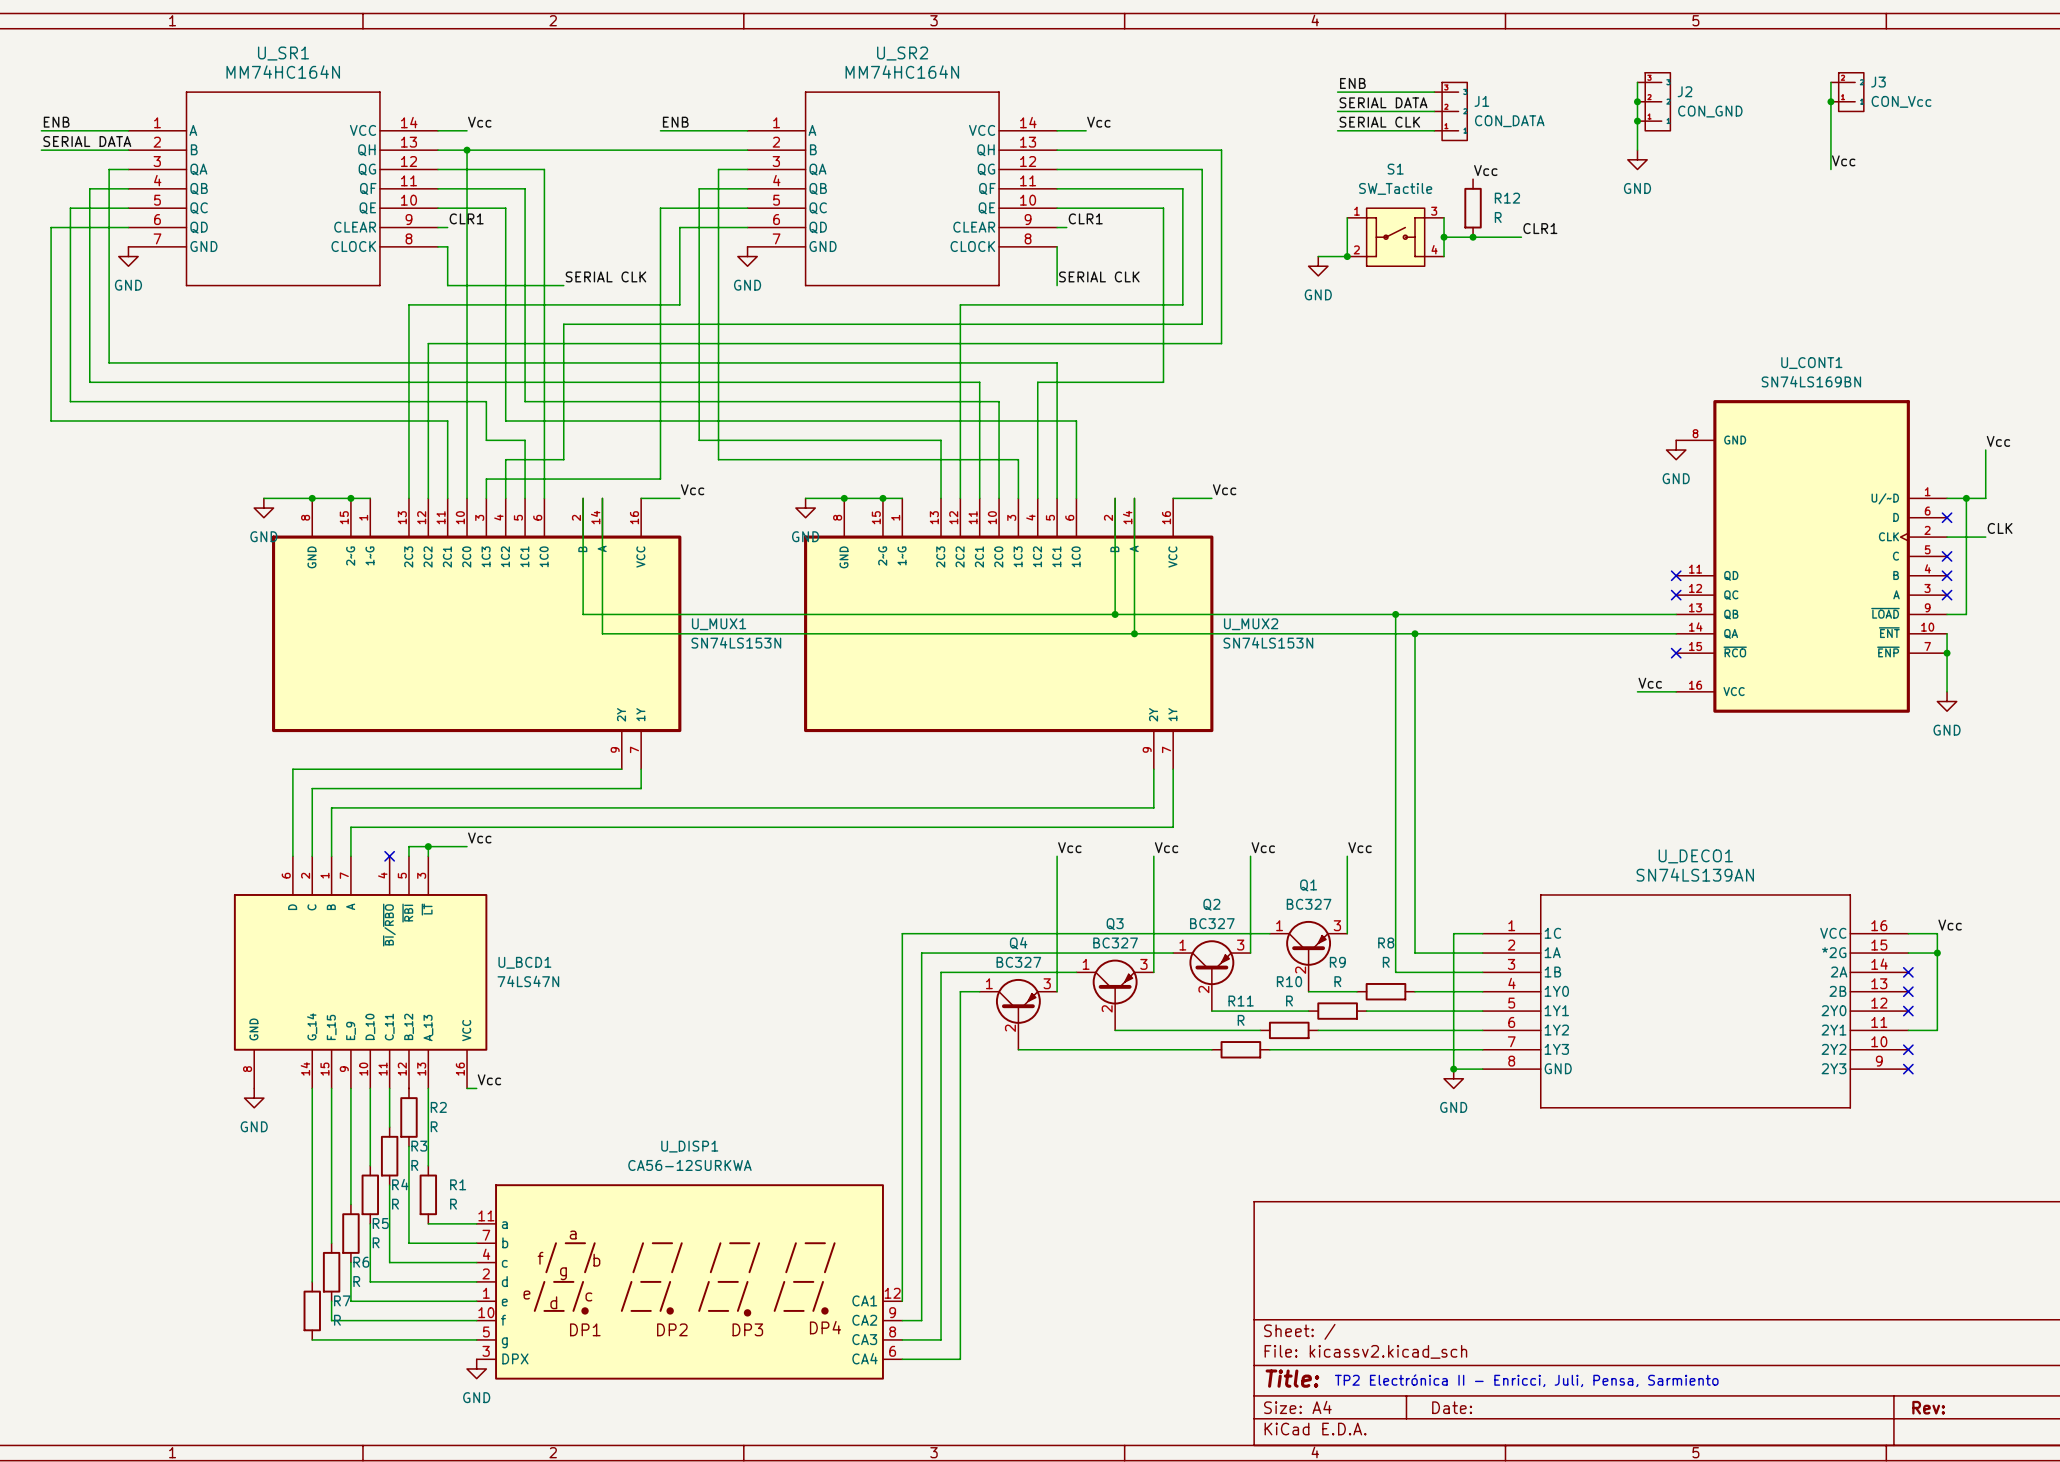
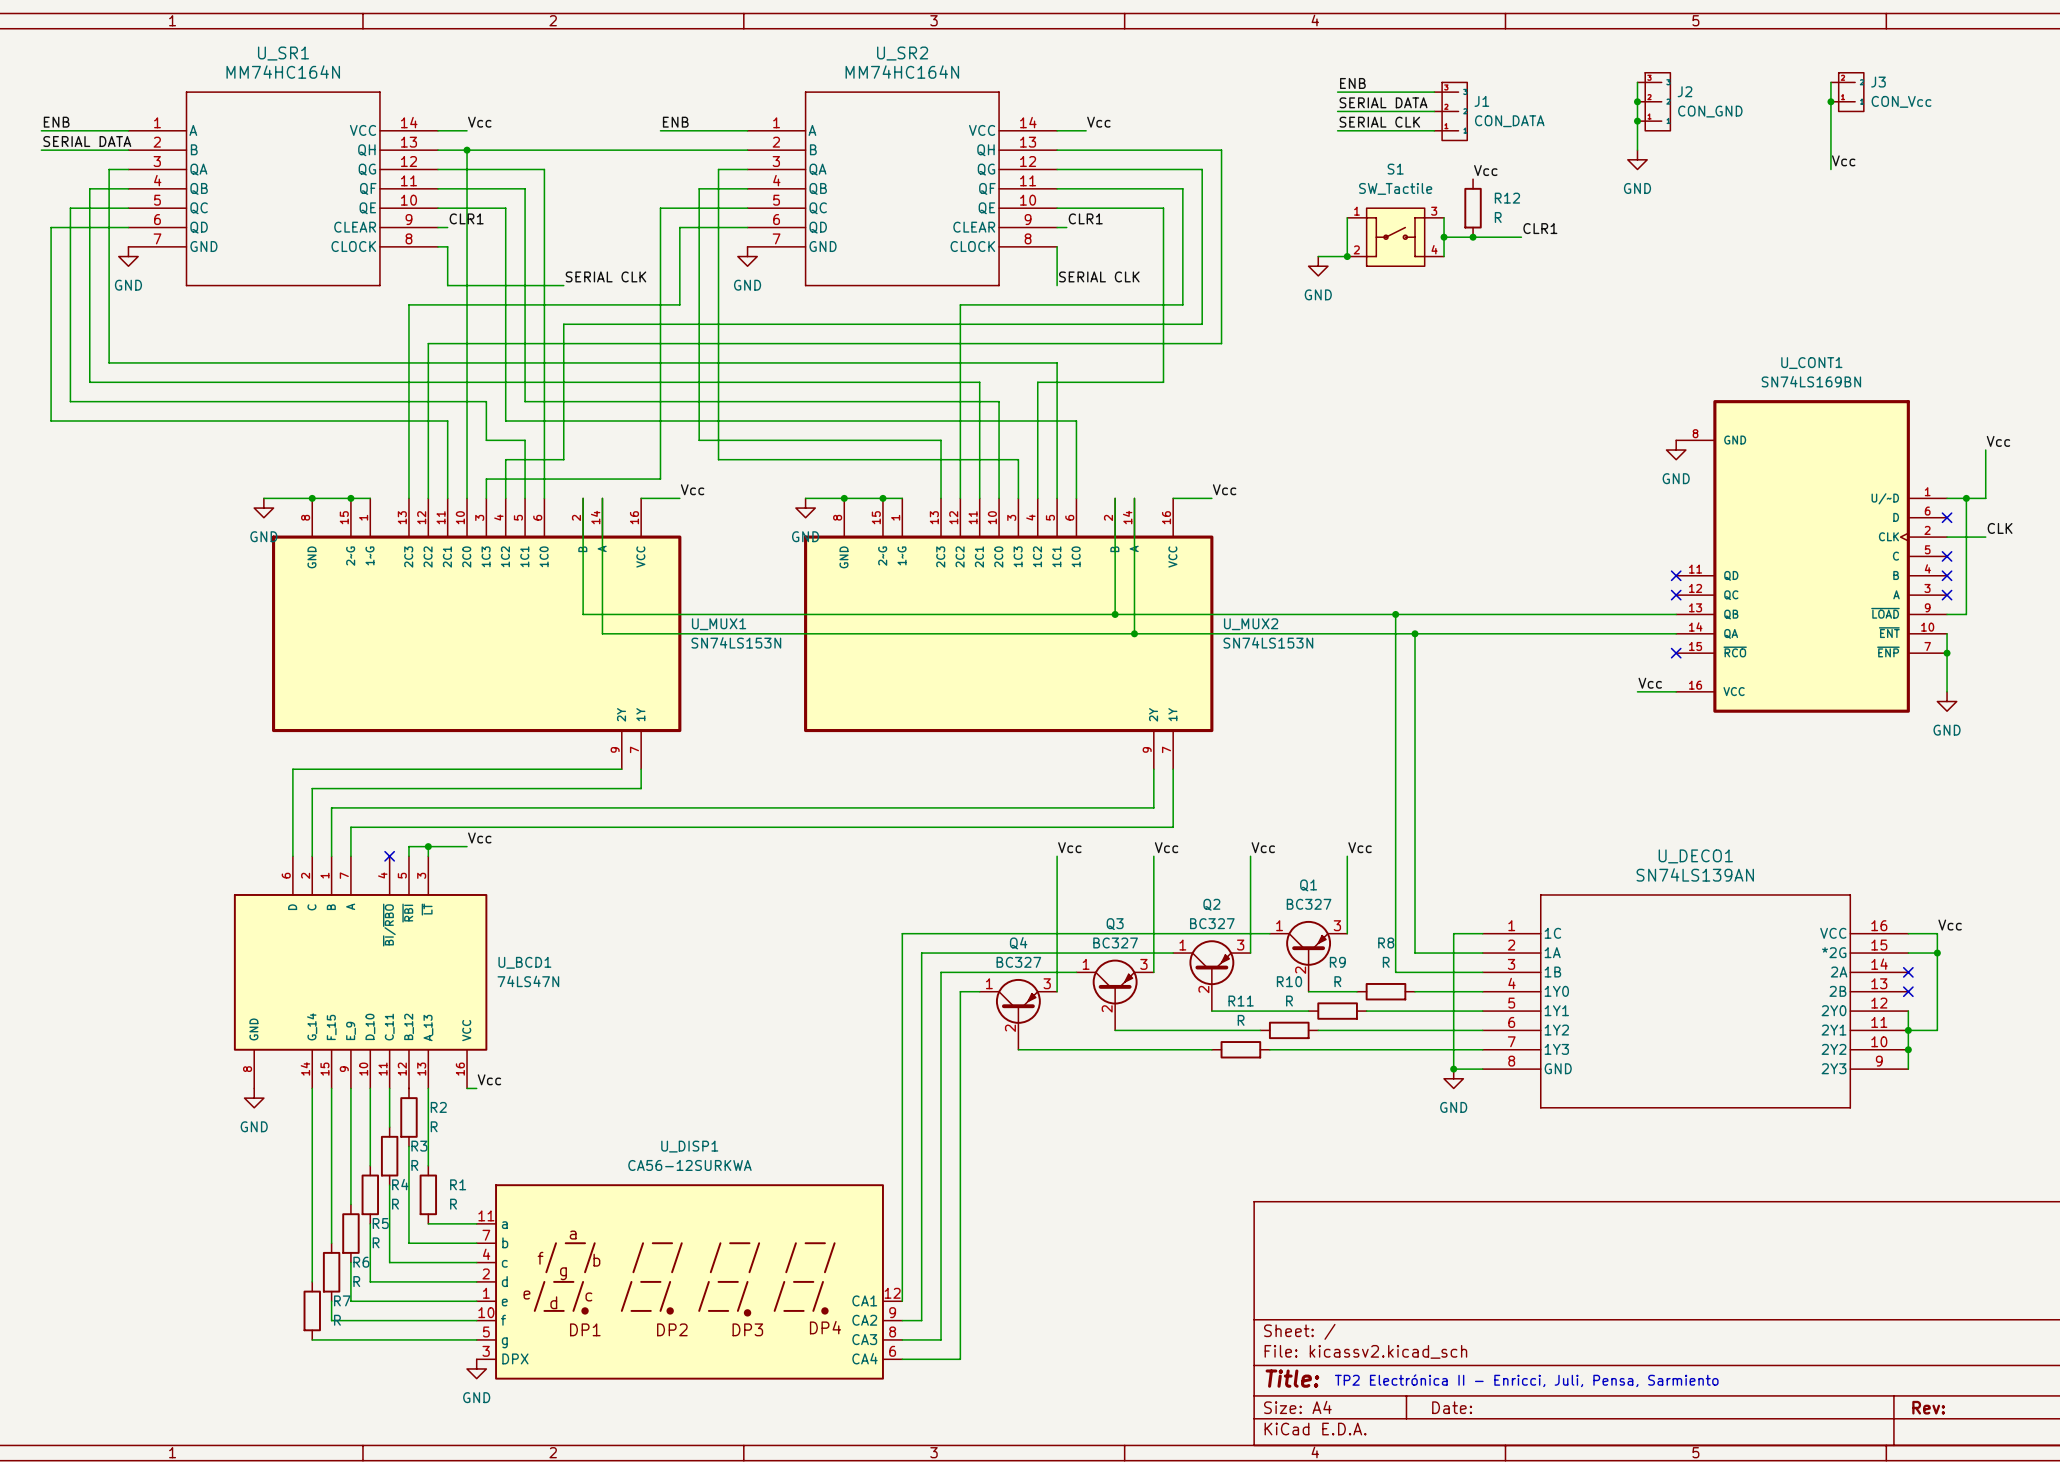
wire: none -> (1908, 1011) (1908, 1069)
no-connect mark: (1908, 1011) -> none
junction: none -> (1908, 1030)
no-connect mark: (1908, 1049) -> none
junction: none -> (1908, 1049)
no-connect mark: (1908, 1069) -> none

